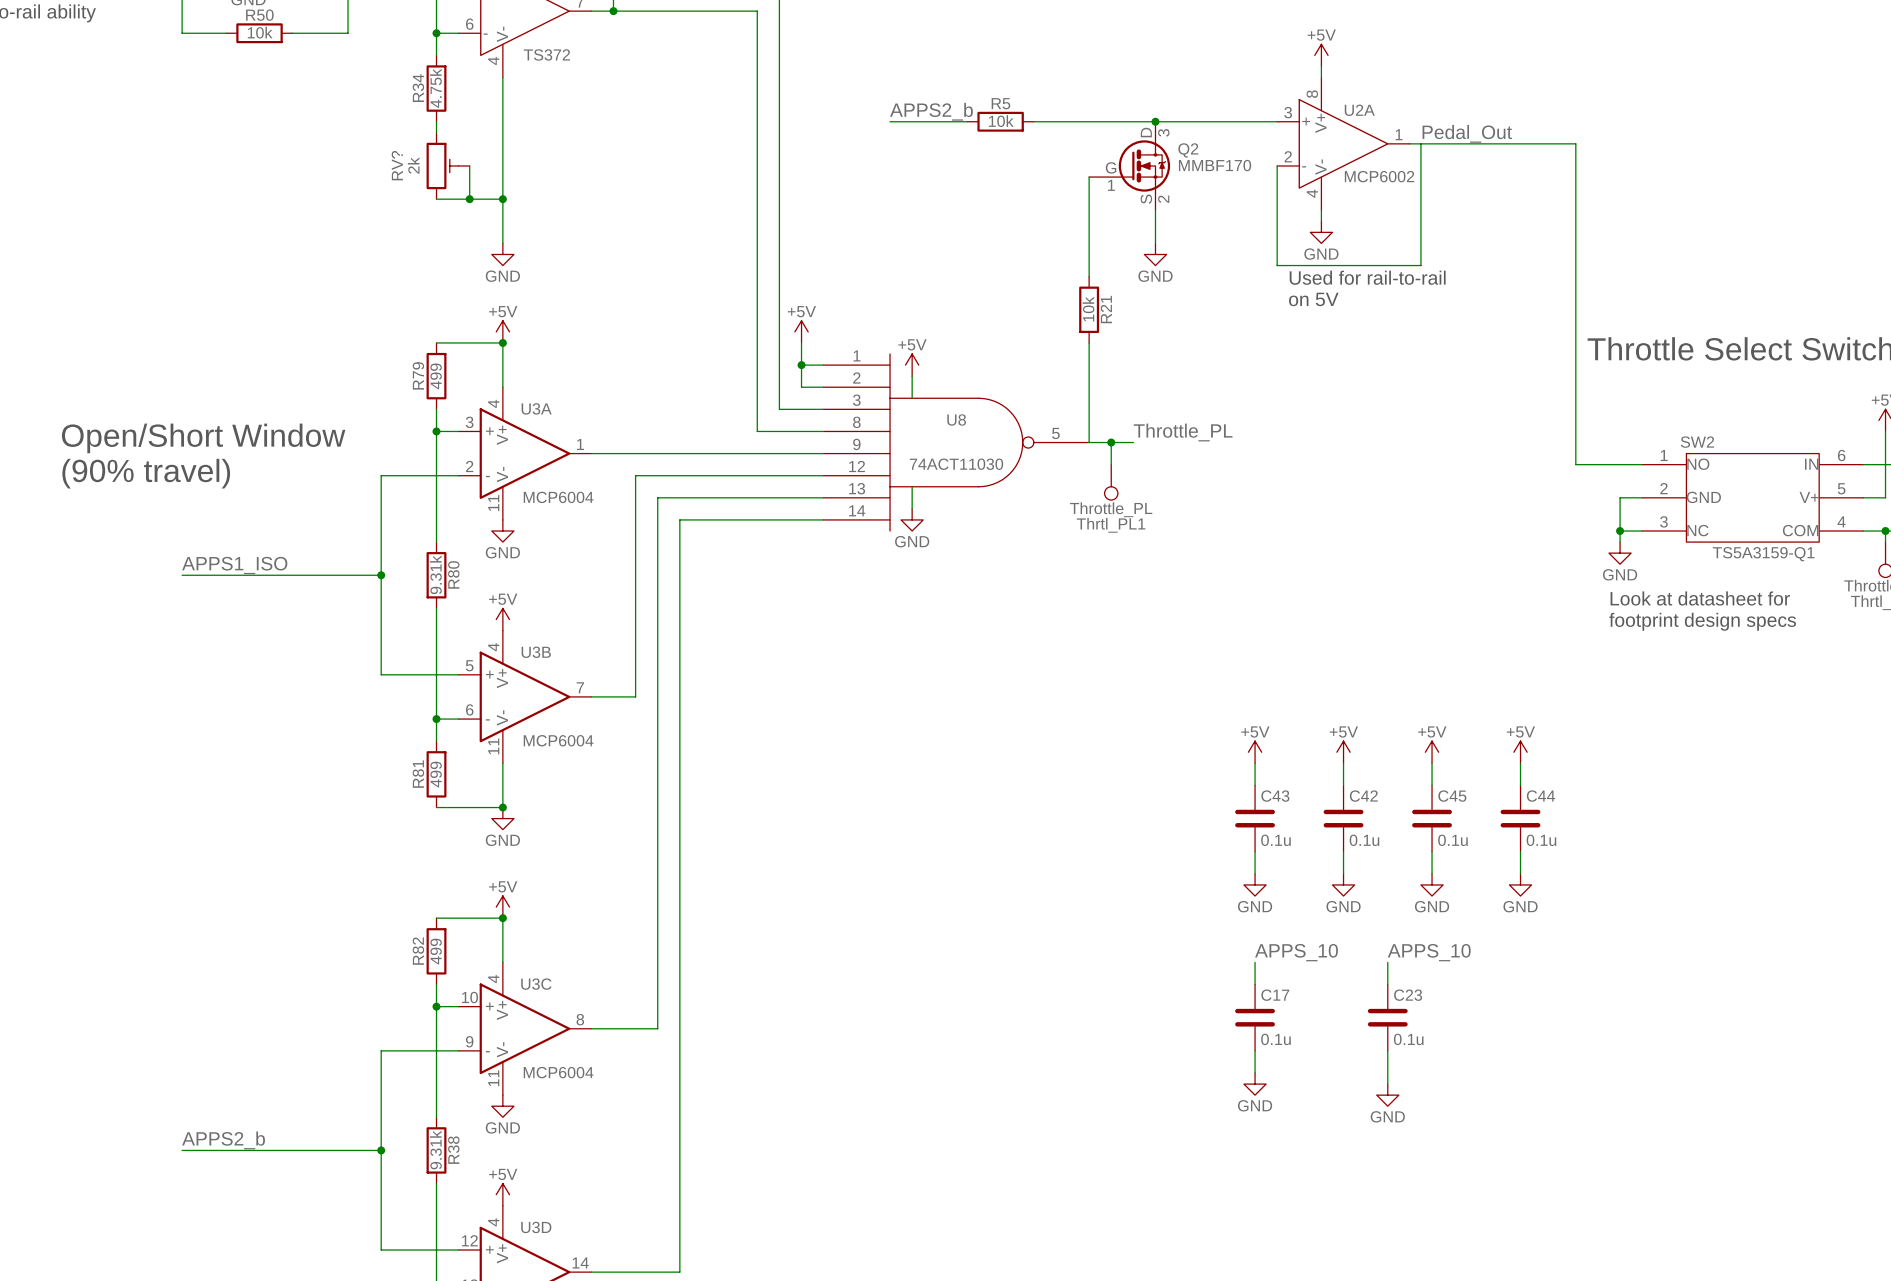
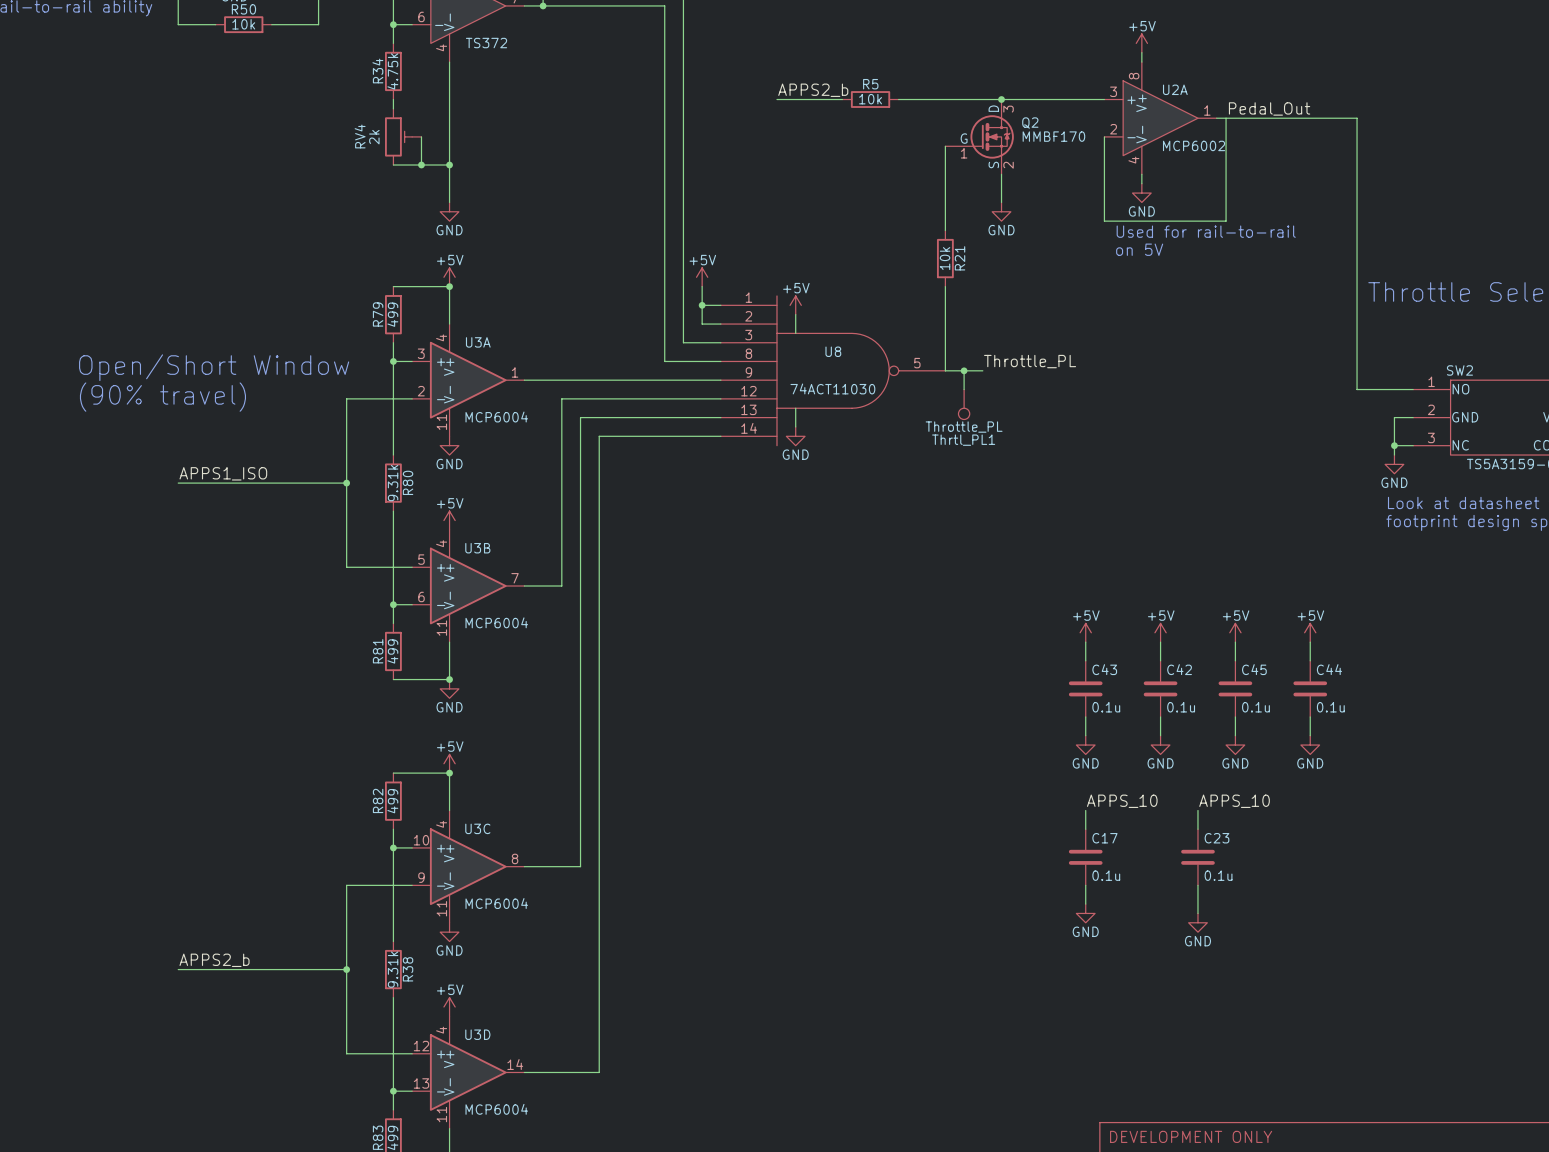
RV? name: RV? (397, 165) -> RV4 (360, 136)

